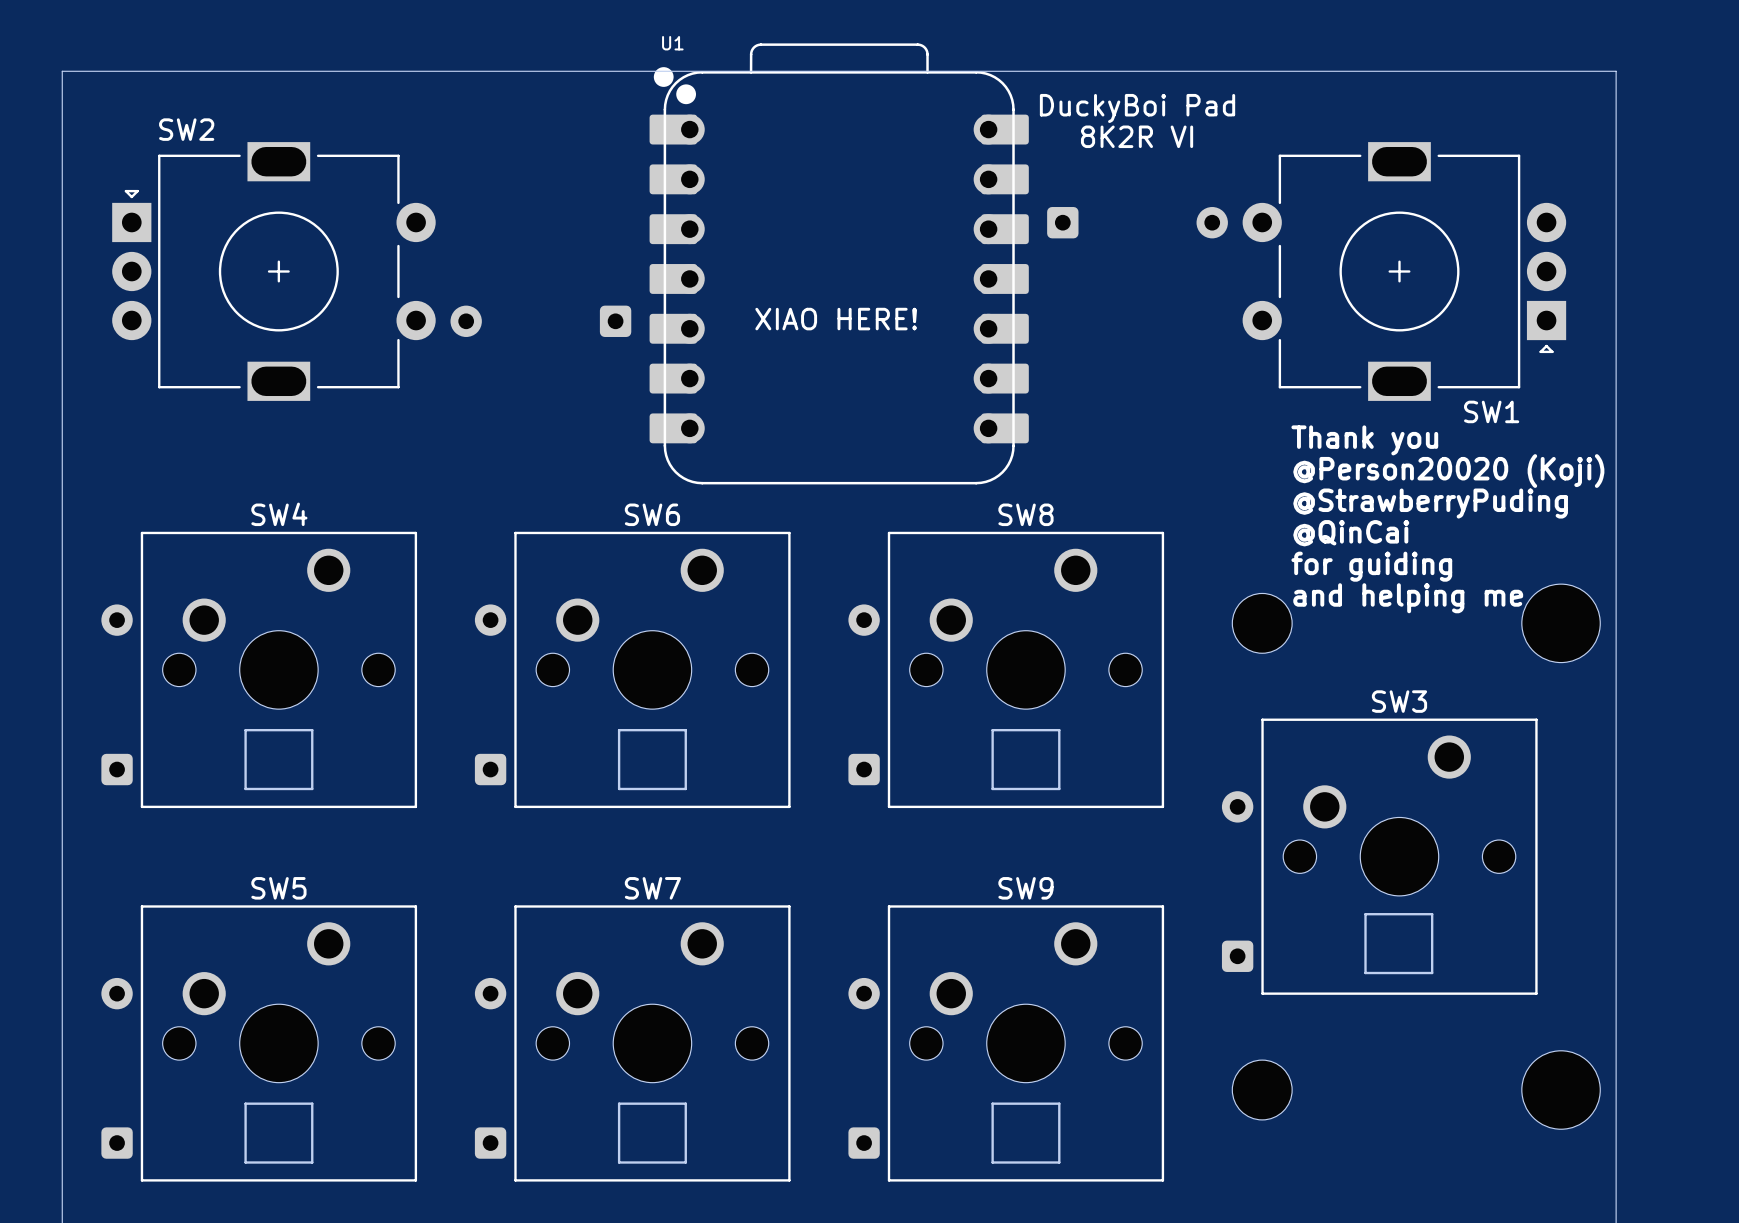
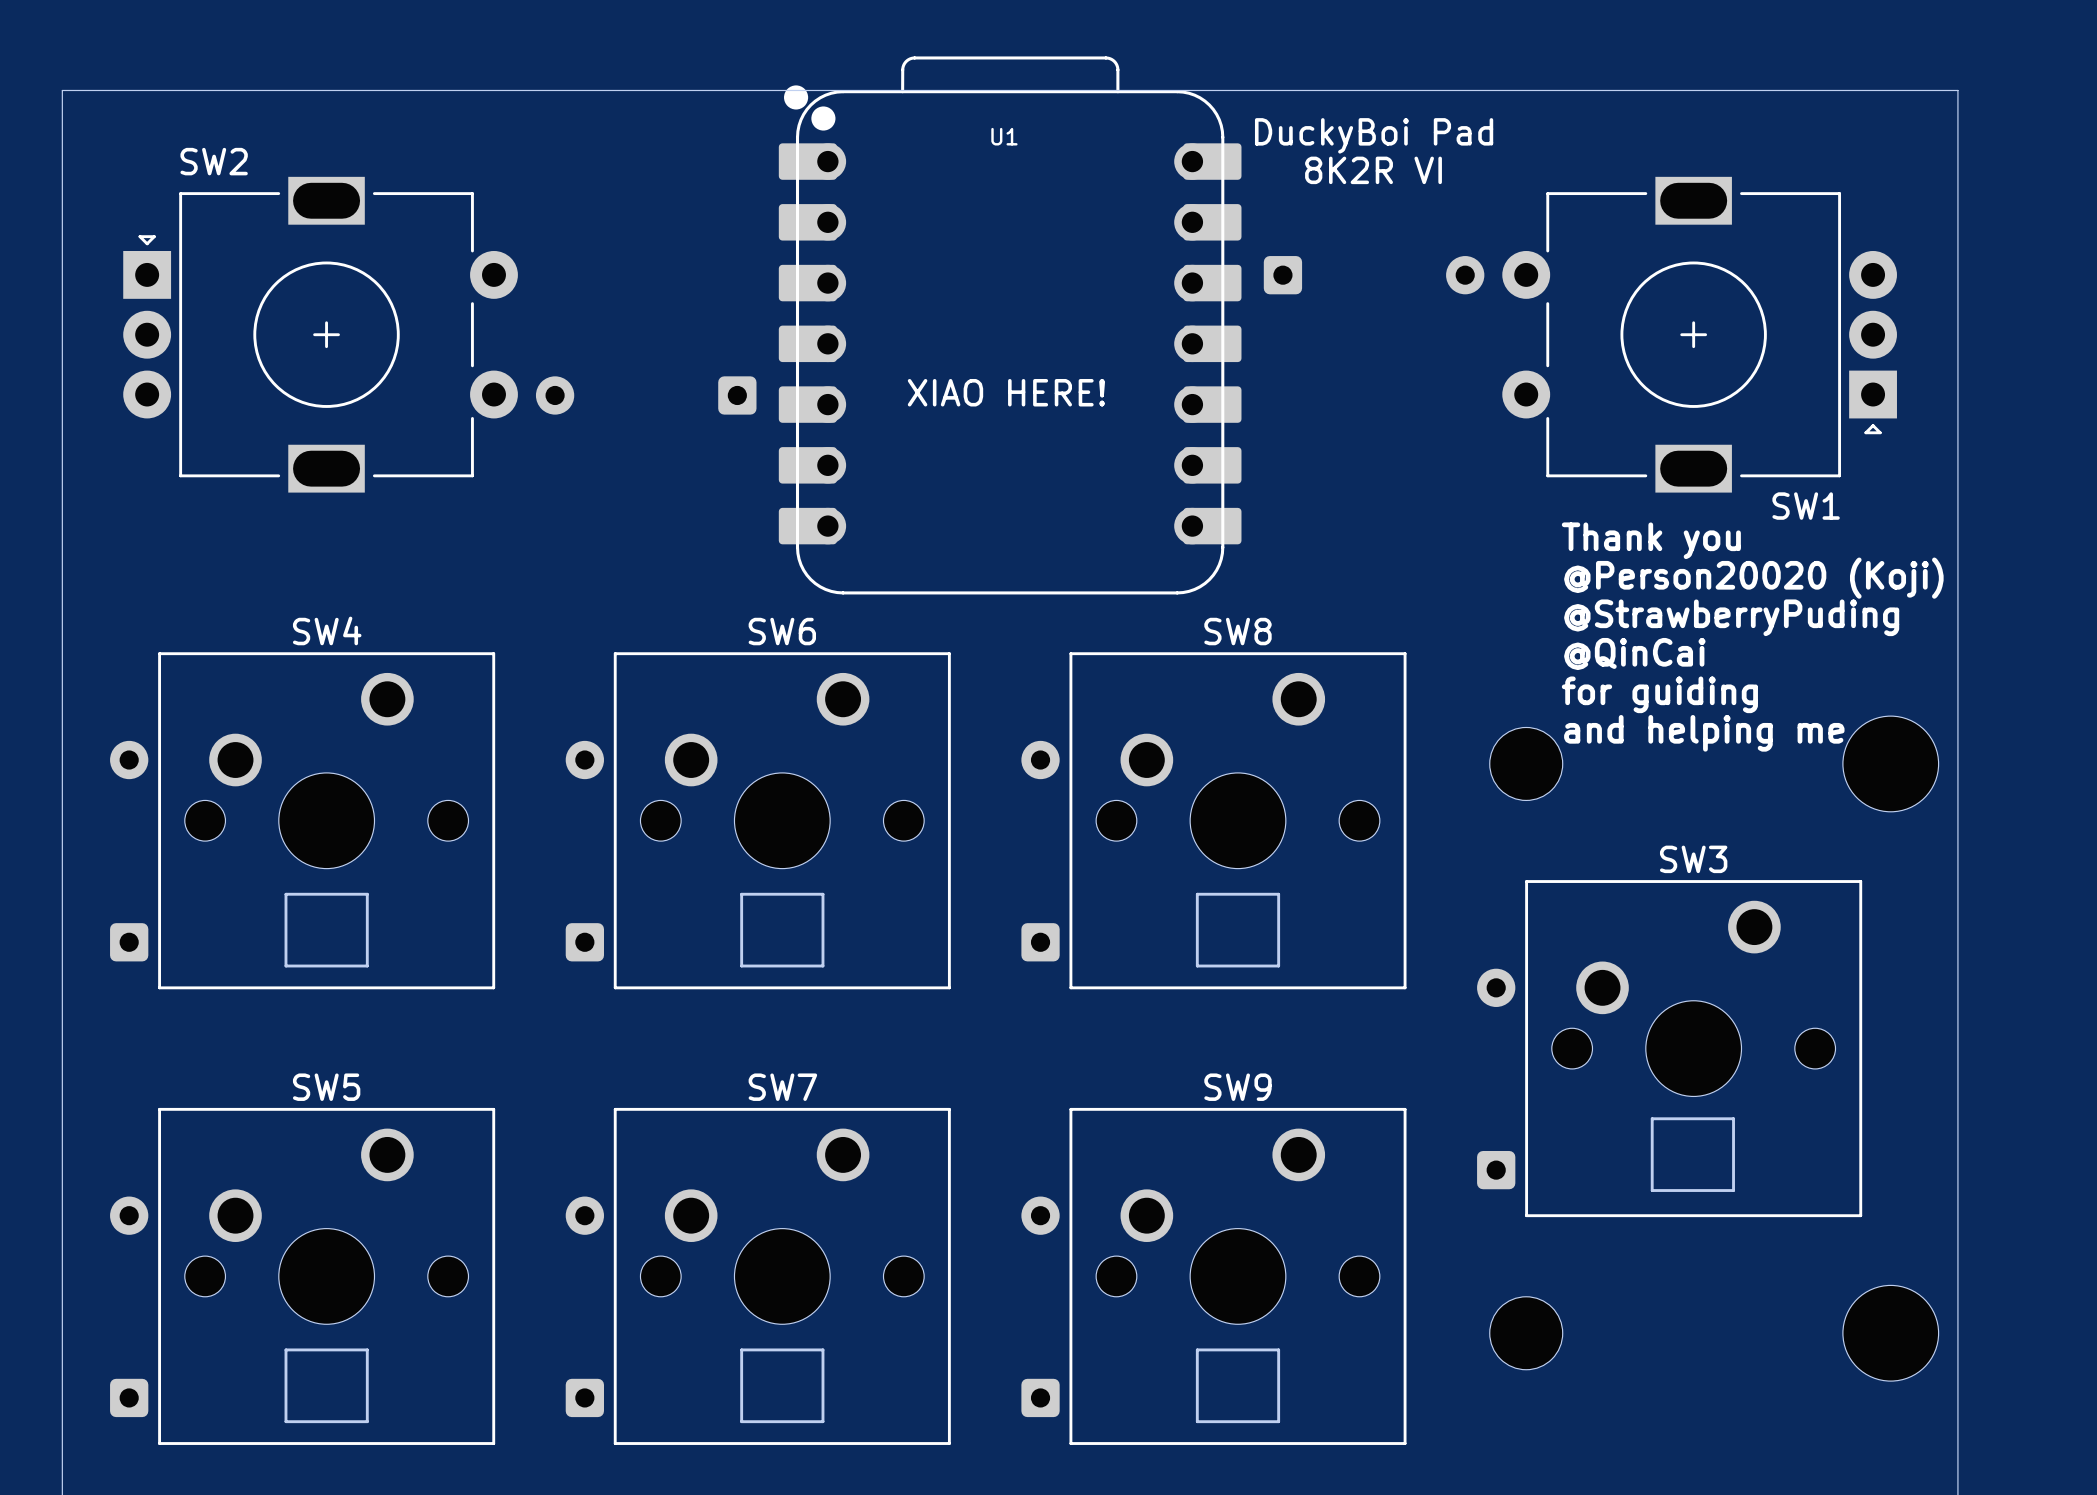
U1 name position: U1 (672, 43) -> U1 (1004, 136)

